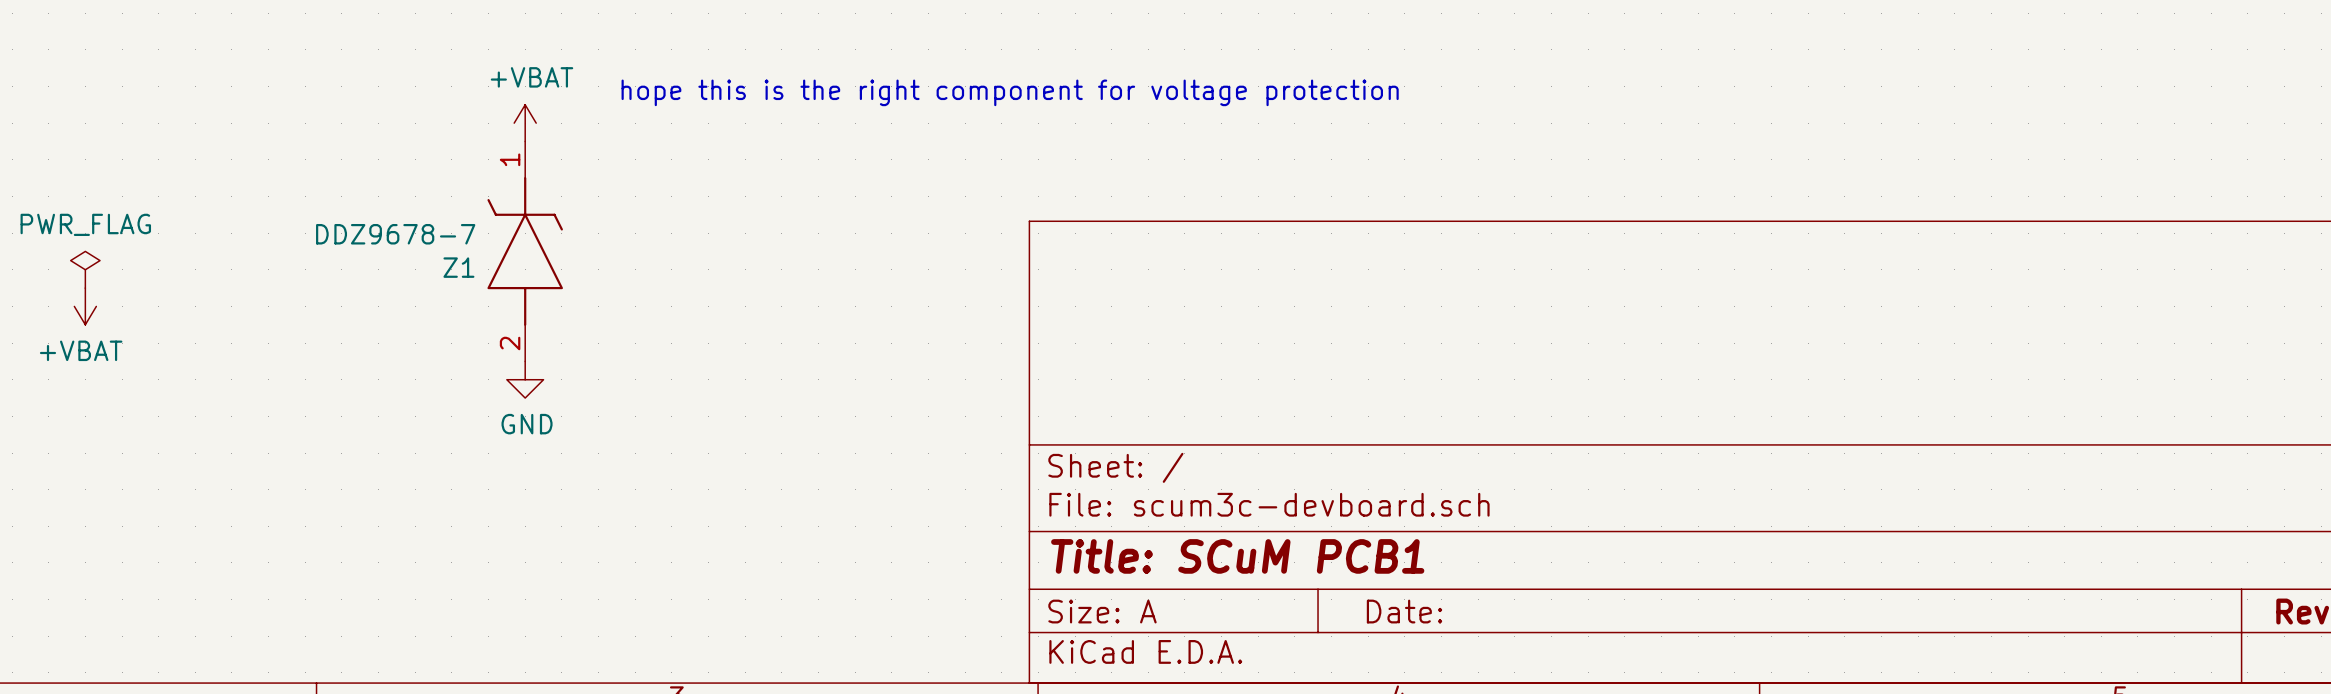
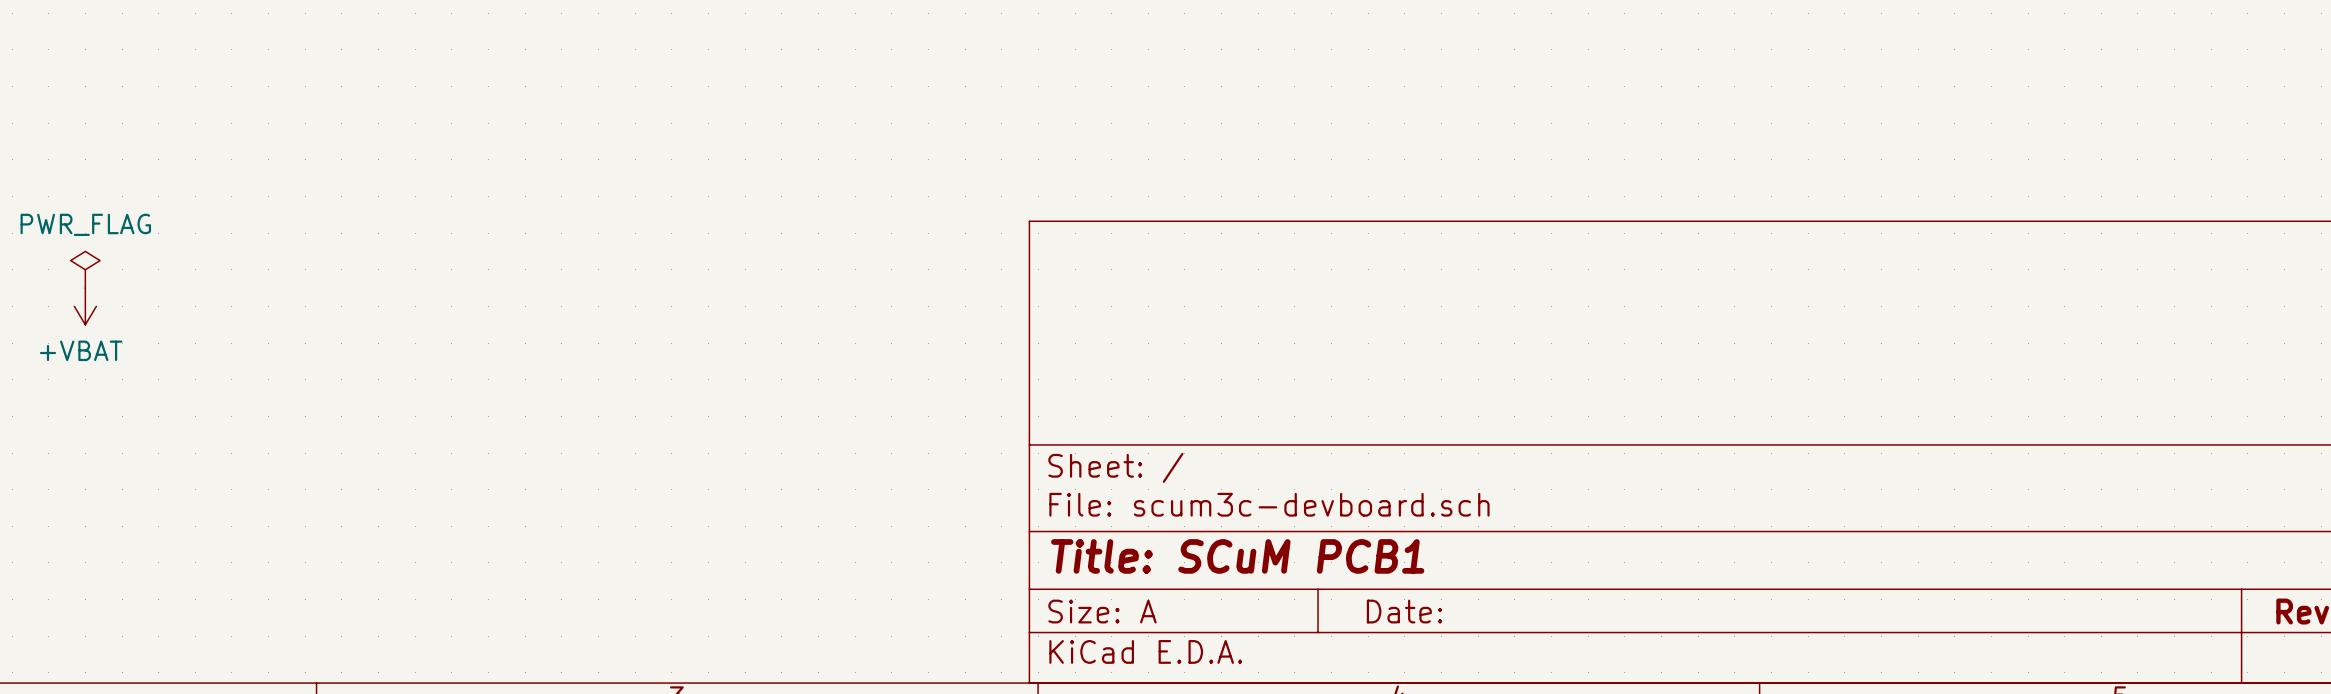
text: hope this is the right component for voltage protection (1010, 92) -> none
power symbol: +VBAT (525, 123) -> none
Z1: DDZ9678-7 (525, 251) -> none
power symbol: GND (525, 379) -> none

